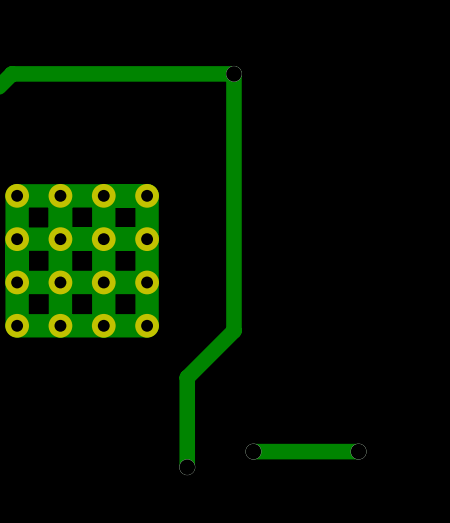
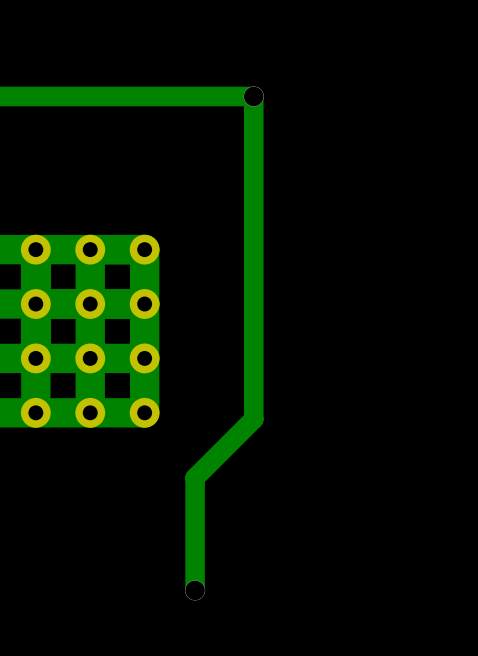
via: (253, 451) -> none
track: (358, 451) (253, 451) -> none
via: (358, 451) -> none

